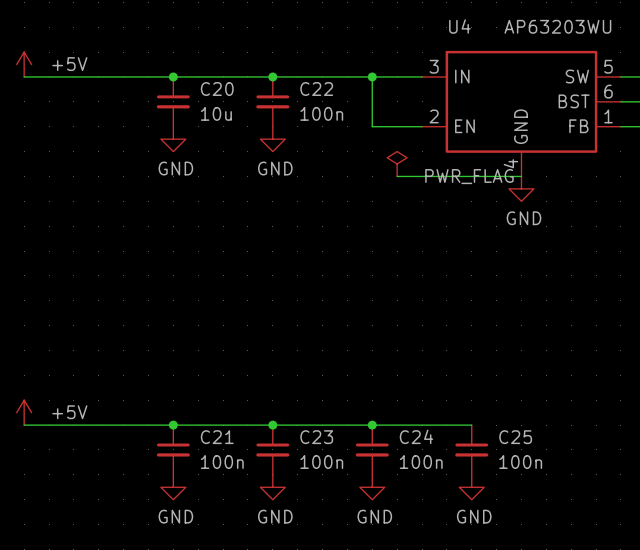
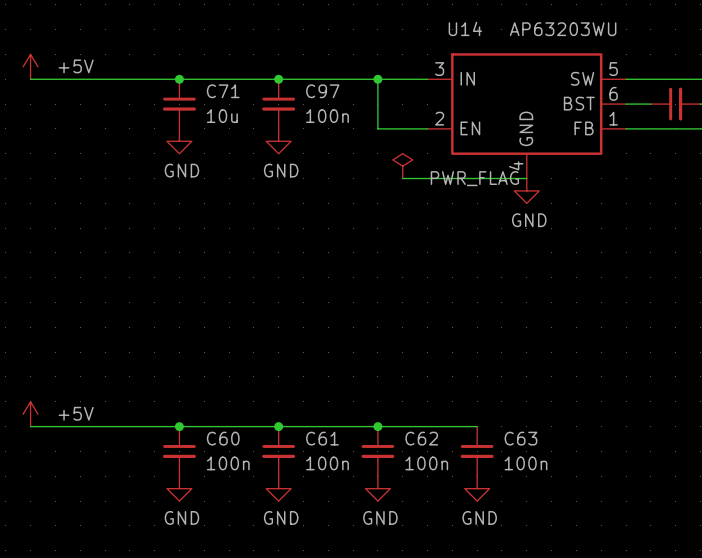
U4 name: U4 (459, 26) -> U14 (465, 28)
C20 name: C20 (217, 89) -> C71 (223, 91)
C22 name: C22 (316, 89) -> C97 (322, 91)
C24 name: C24 (416, 436) -> C62 (421, 438)
C21 name: C21 (217, 437) -> C60 (223, 438)
C23 name: C23 (316, 437) -> C61 (322, 438)
C25 name: C25 (515, 437) -> C63 (520, 438)

